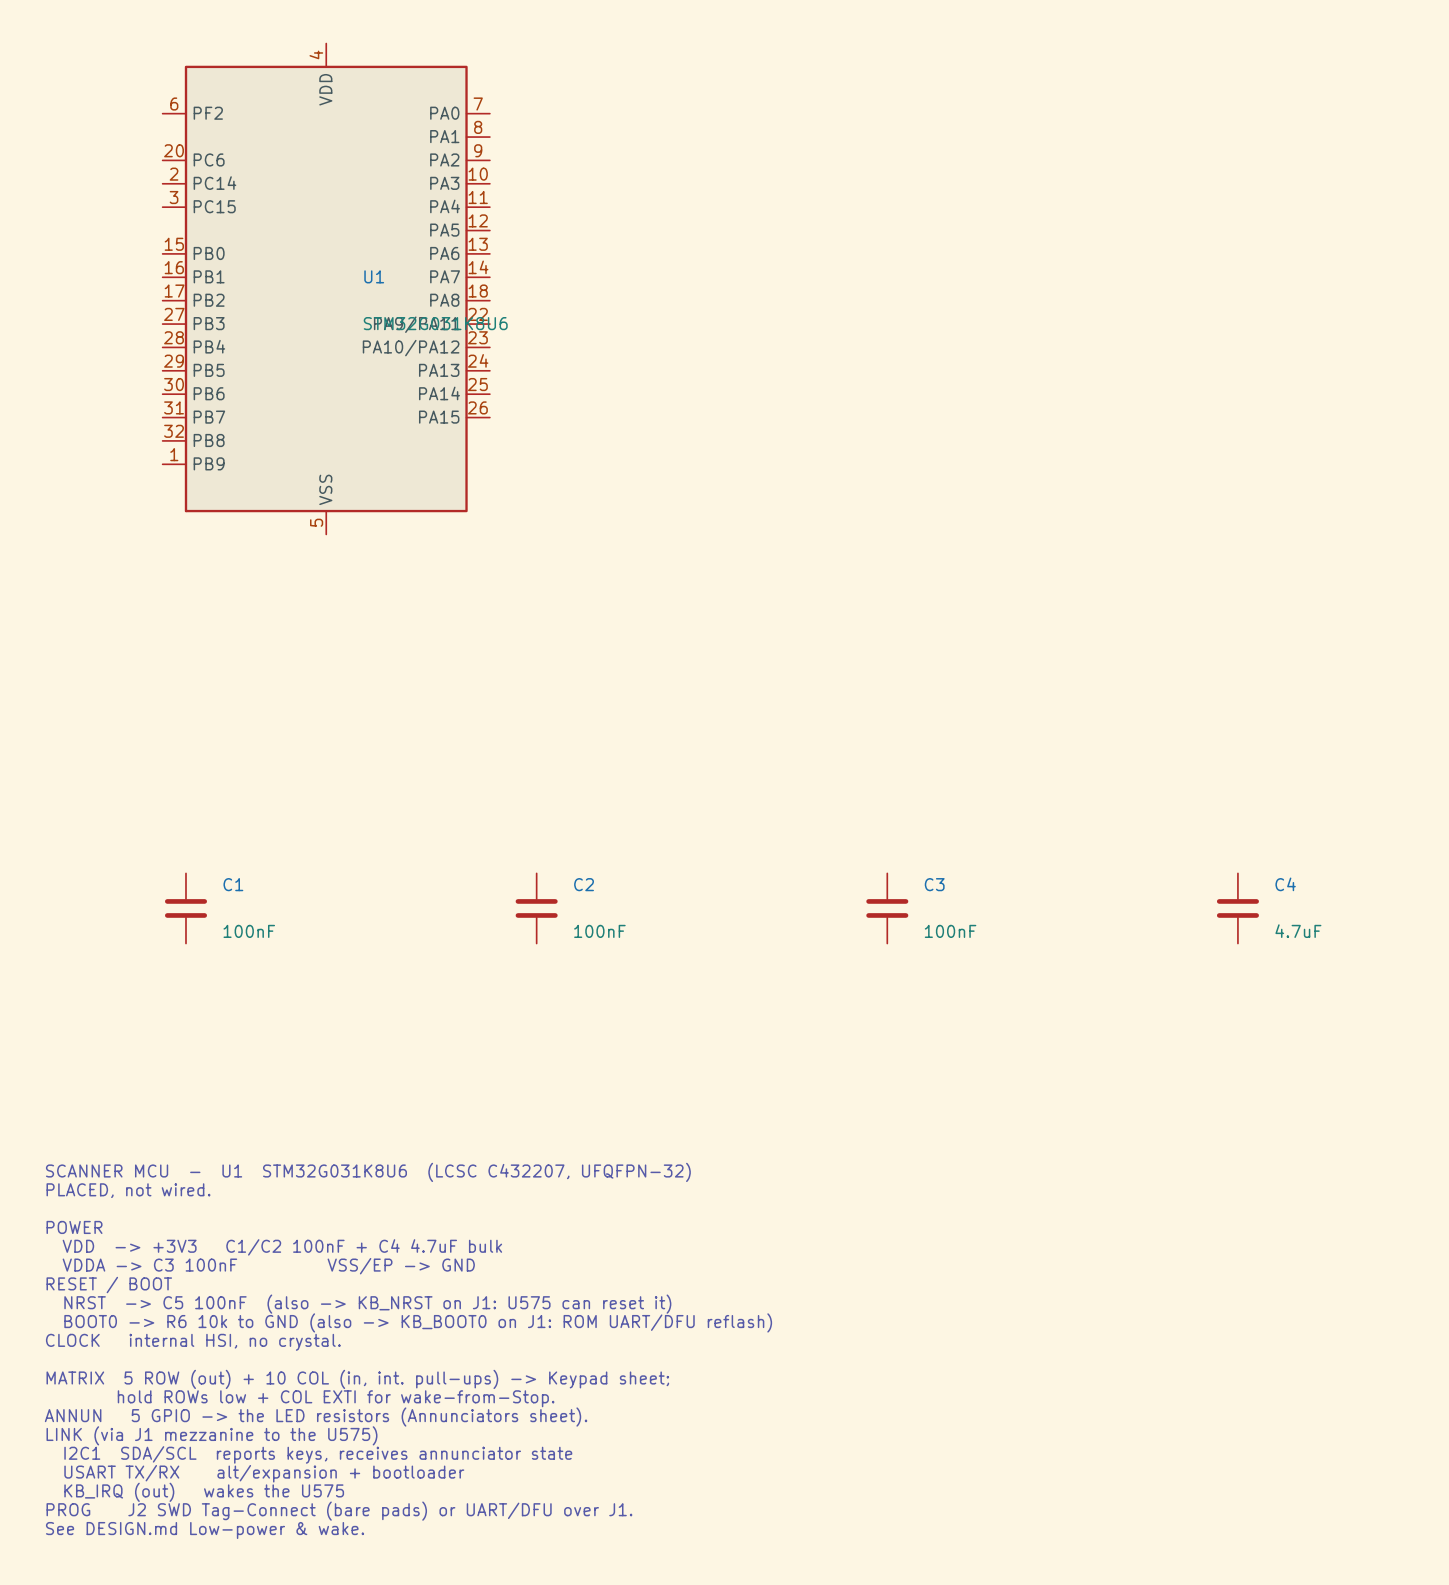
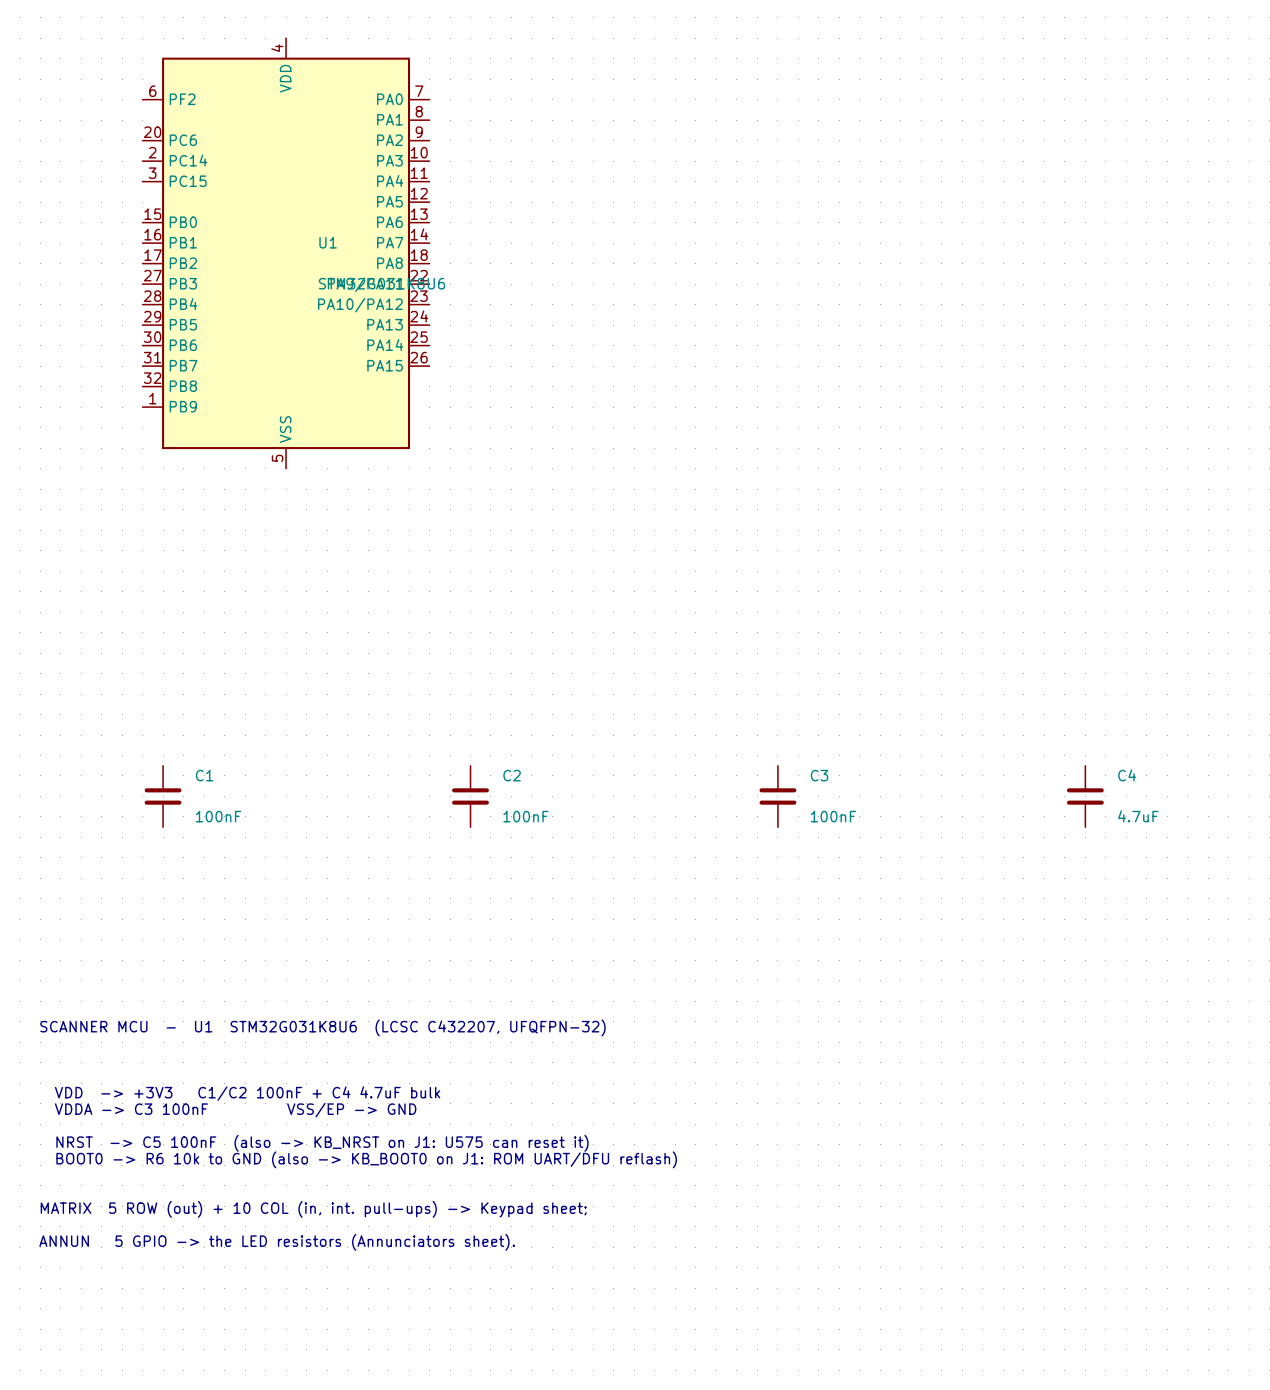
text: PLACED, not wired. (128, 1190) -> none
text: POWER (74, 1227) -> none
text: RESET / BOOT (109, 1285) -> none
text: CLOCK internal HSI, no crystal. (193, 1342) -> none
text: hold ROWs low + COL EXTI for wake-from-Stop. (336, 1398) -> none
text: LINK (via J1 mezzanine to the U575) (211, 1435) -> none
text: I2C1 SDA/SCL reports keys, receives annunciator state (318, 1454) -> none
text: USART TX/RX alt/expansion + bootloader (264, 1473) -> none
text: KB_IRQ (out) wakes the U575 (204, 1492) -> none
text: PROG J2 SWD Tag-Connect (bare pads) or UART/DFU over J1. (339, 1511) -> none
text: See DESIGN.md Low-power & wake. (205, 1530) -> none

